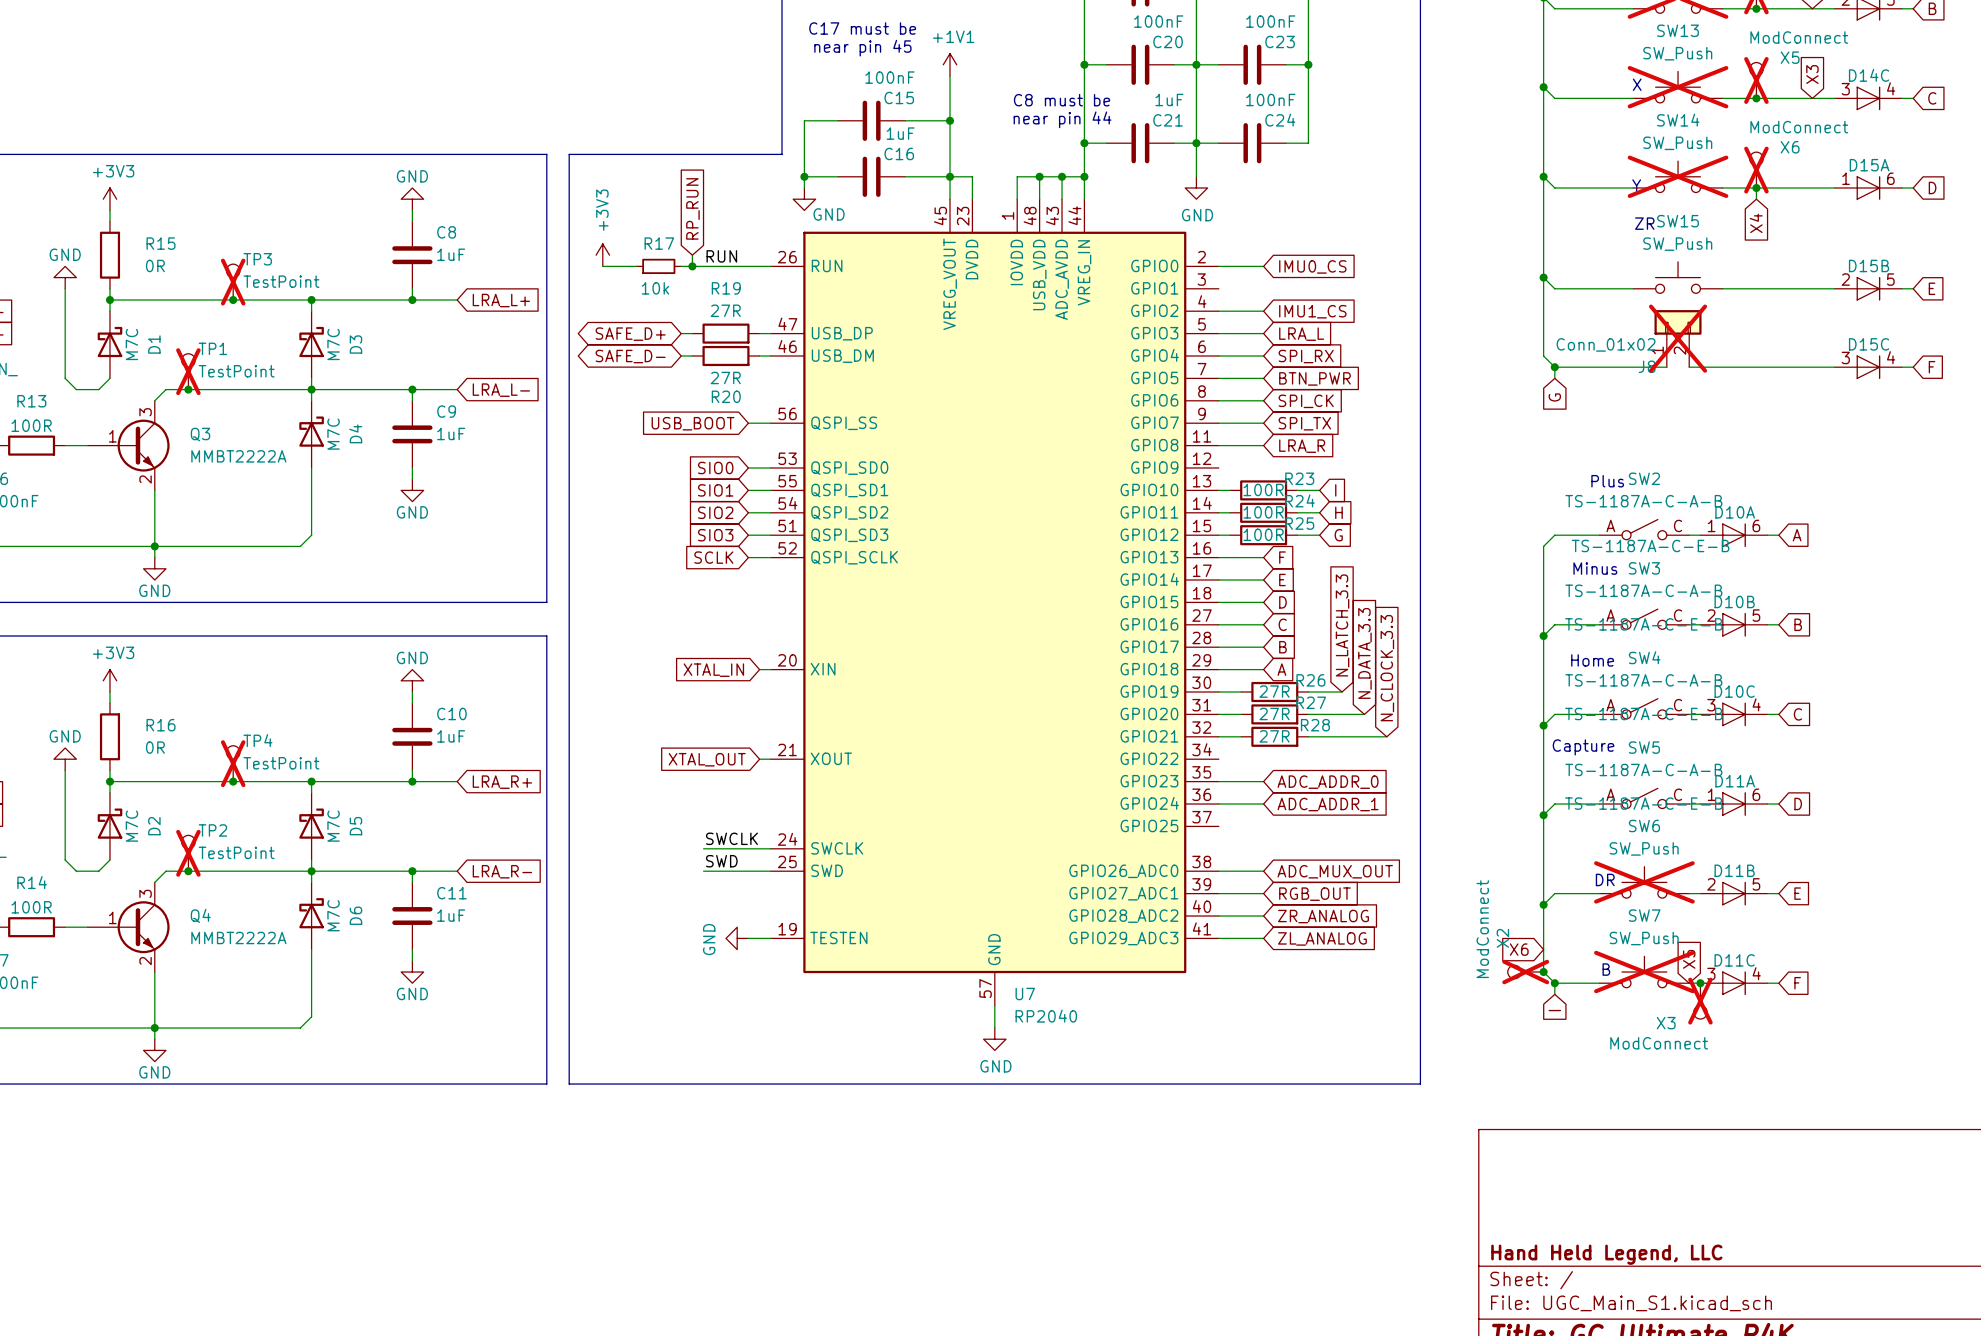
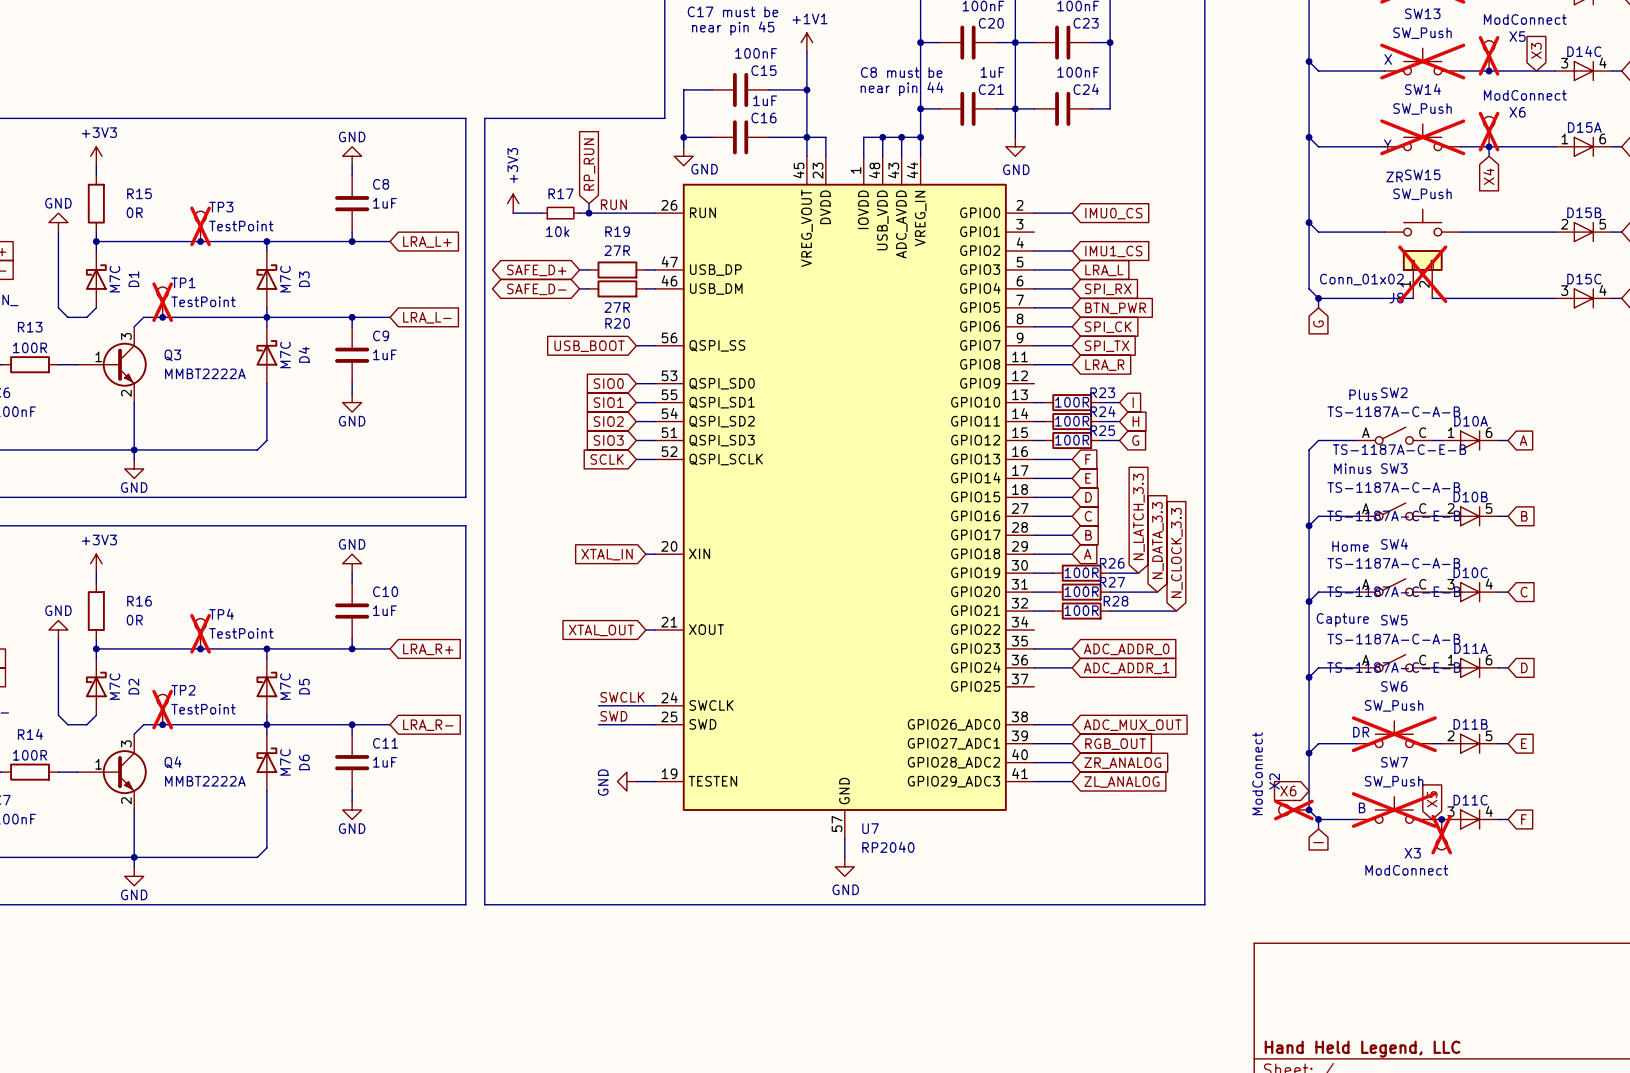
R26 value: 27R (1274, 691) -> 100R (1081, 572)
R27 value: 27R (1274, 713) -> 100R (1081, 591)
R28 value: 27R (1274, 736) -> 100R (1081, 610)

